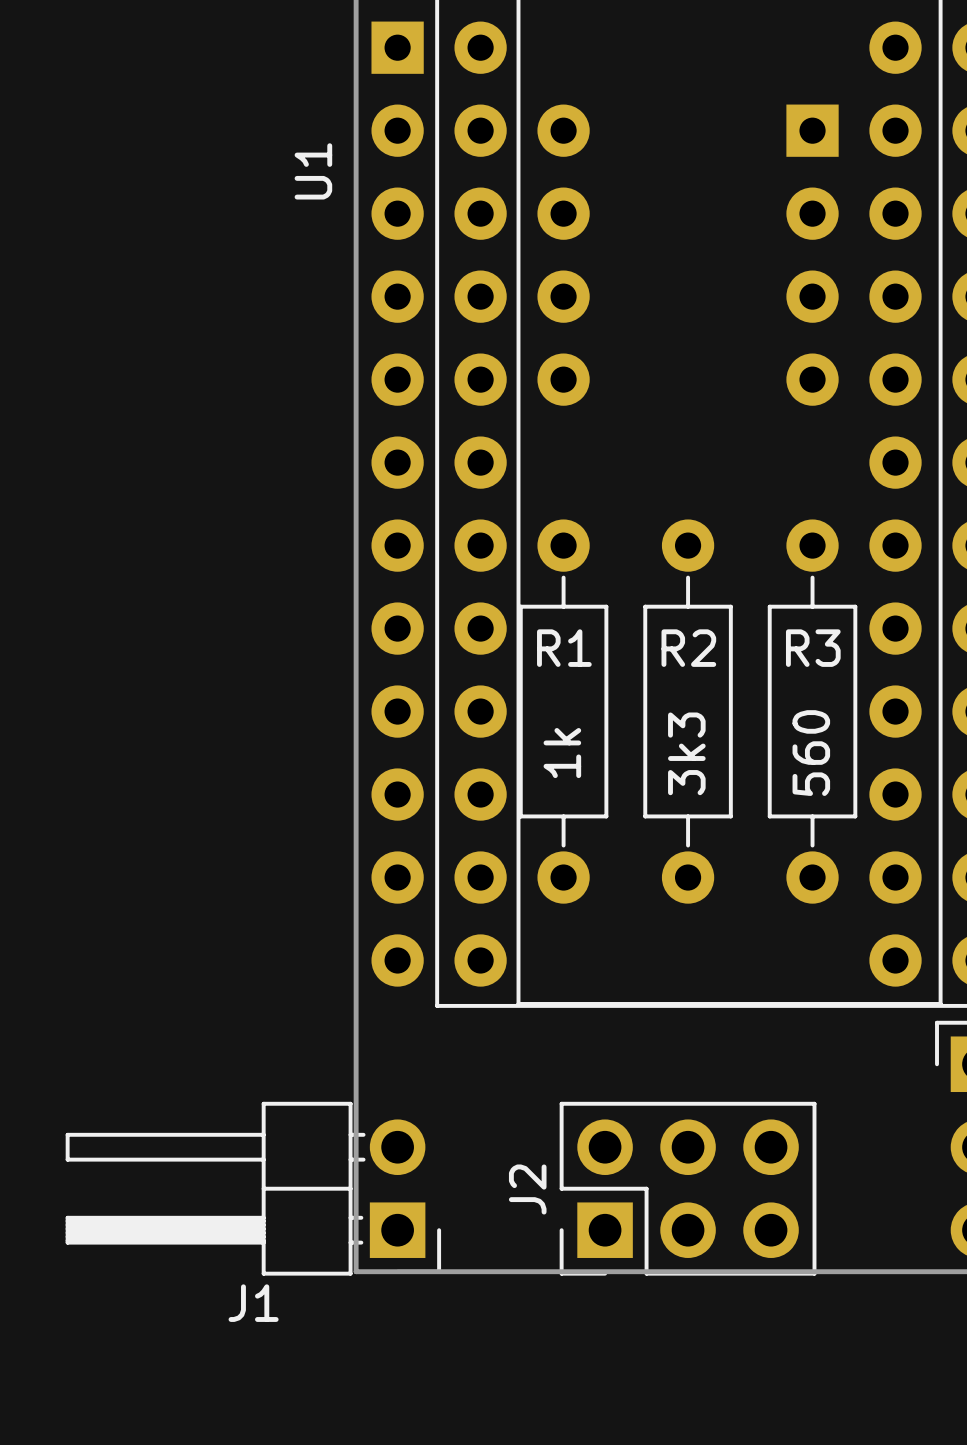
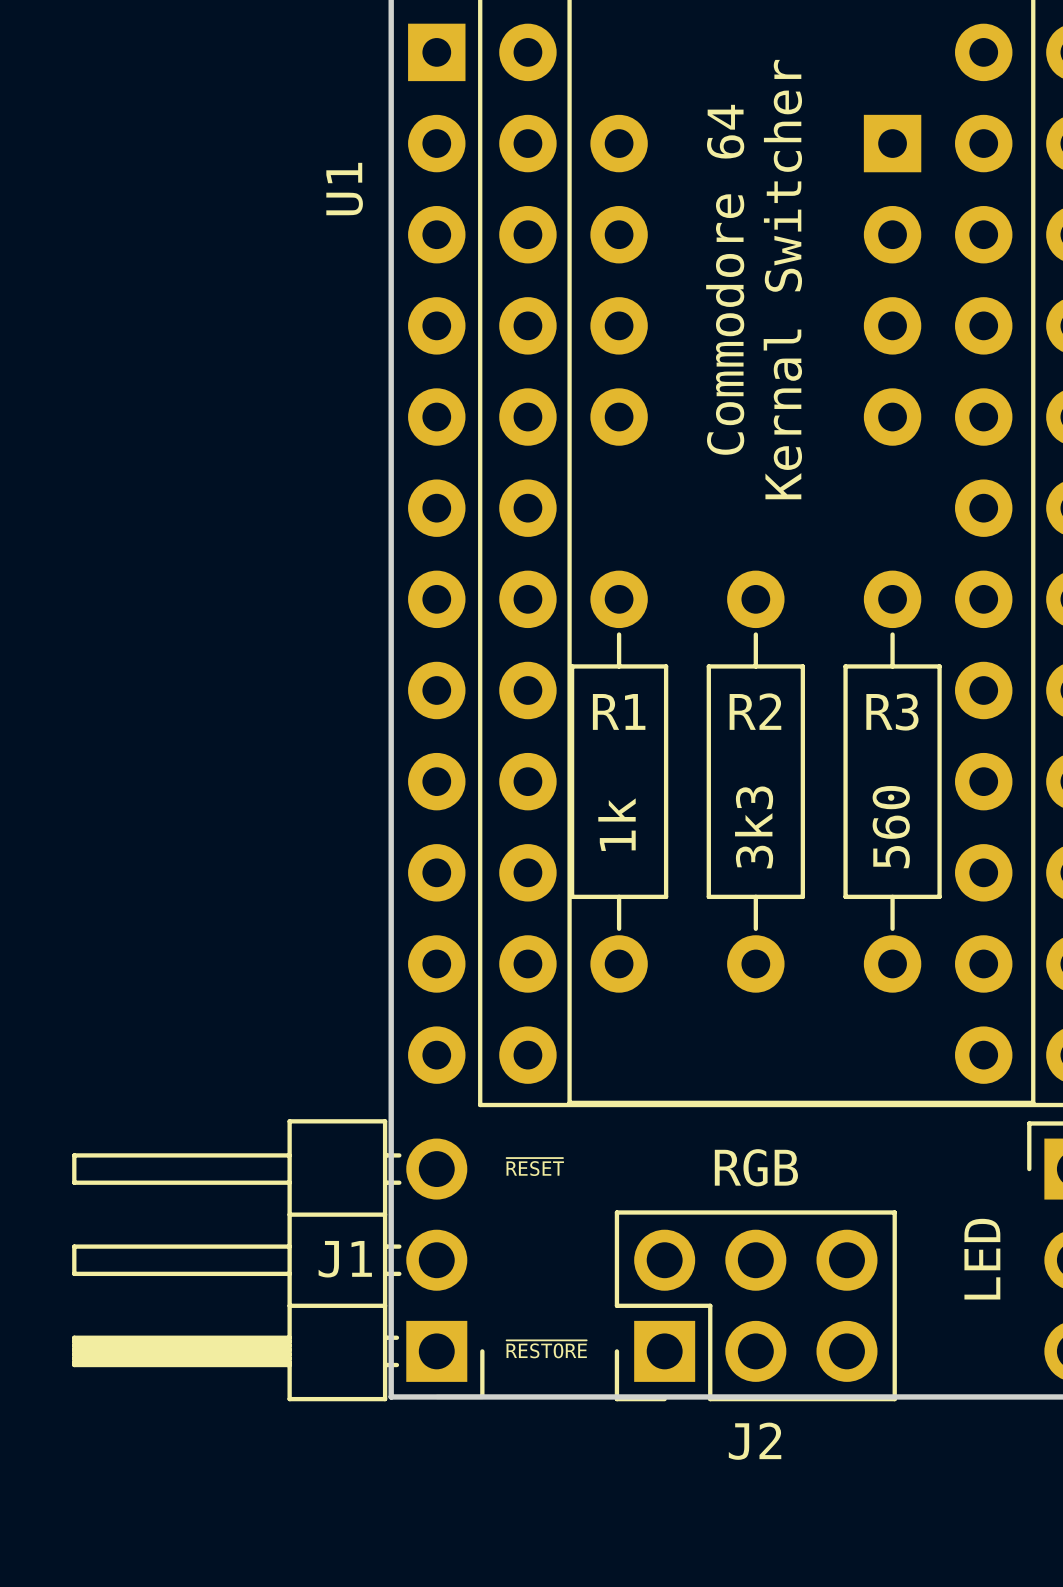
text: none -> Kernal Switcher (782, 279)
text: none -> Commodore 64 (725, 279)
text: none -> ~{RESET} (535, 1167)
text: none -> RGB (756, 1167)
J1 footprint: [65, 1101, 442, 1276] -> [72, 1119, 485, 1402]
text: none -> LED (982, 1259)
J2 name rotation: 0° (527, 1189) -> 90° clockwise (755, 1441)
J2 name position: J2 (527, 1189) -> J2 (755, 1441)
text: none -> ~{RESTORE} (546, 1349)
J1 name position: J1 (253, 1303) -> J1 (345, 1259)

